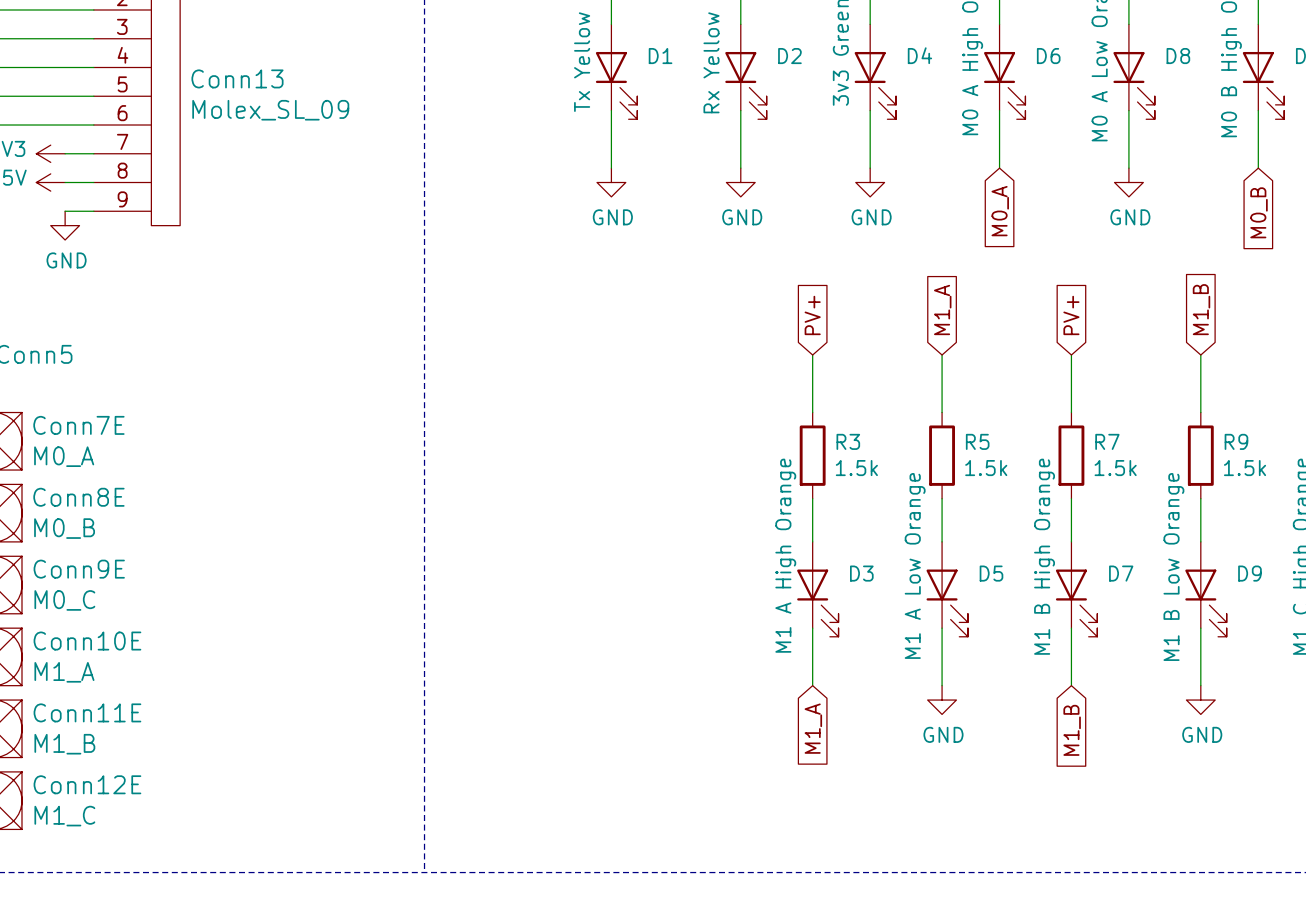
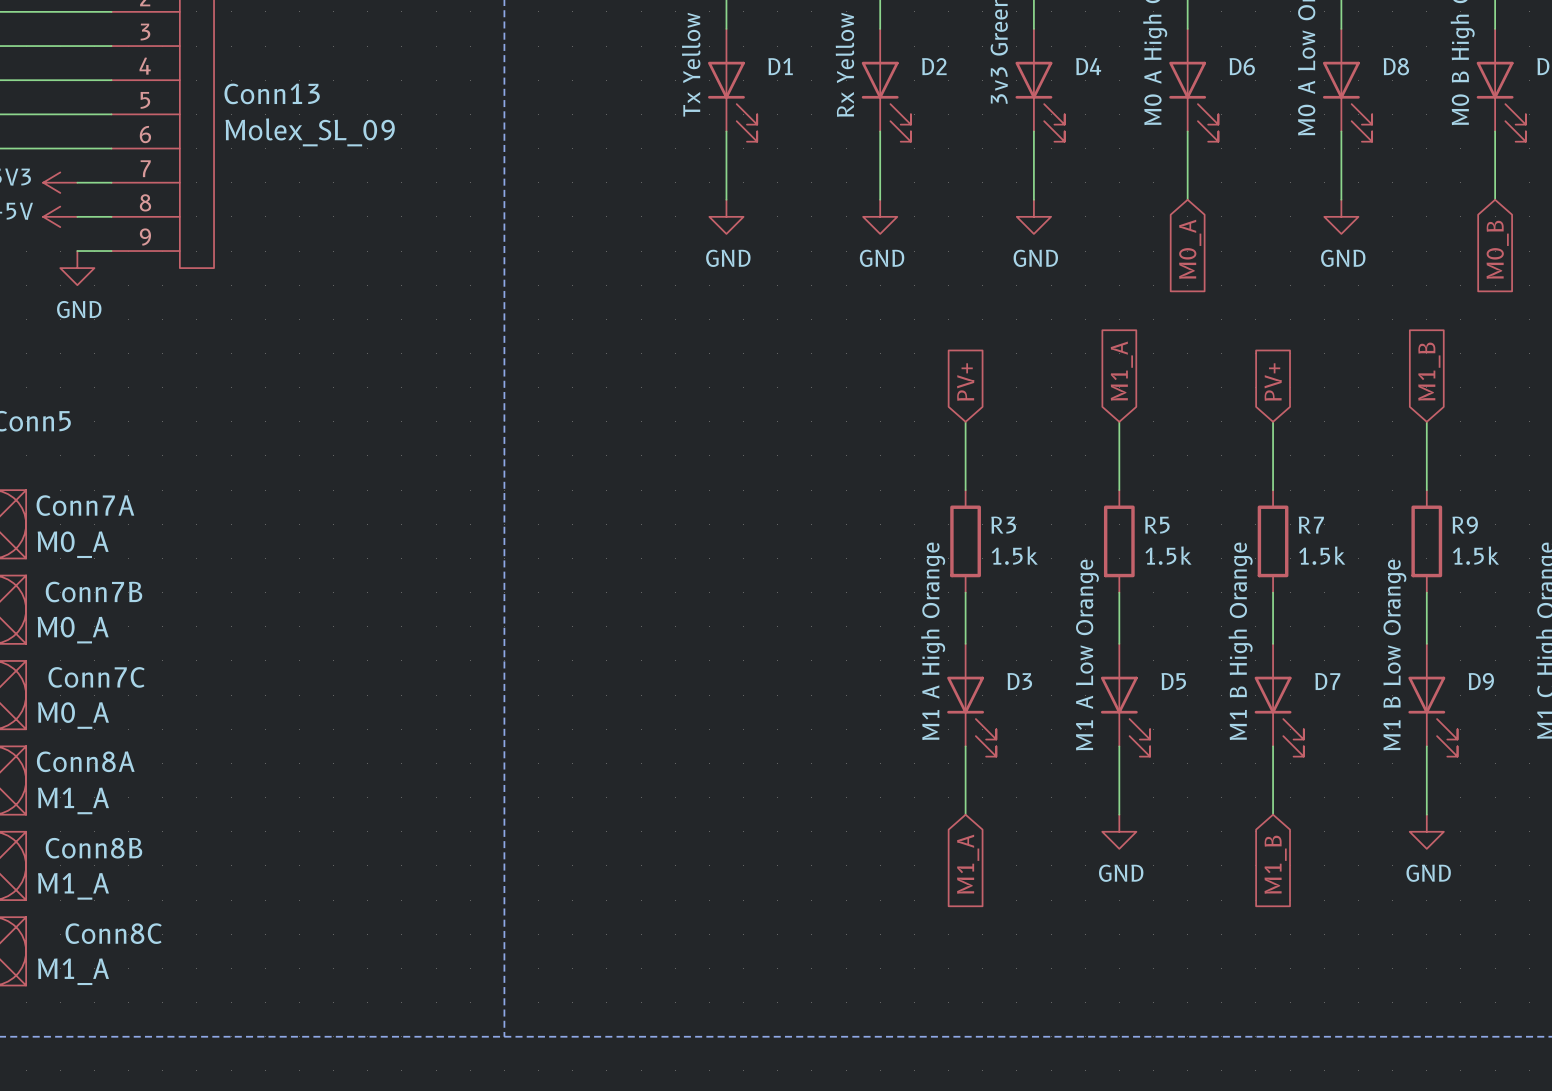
Conn7E name: Conn7E (78, 425) -> Conn7A (85, 505)
Conn8E name: Conn8E (78, 497) -> Conn7B (93, 592)
Conn8E value: M0_B (64, 528) -> M0_A (73, 630)
Conn9E name: Conn9E (79, 569) -> Conn7C (96, 677)
Conn9E value: M0_C (64, 600) -> M0_A (73, 715)
Conn10E name: Conn10E (87, 641) -> Conn8A (85, 761)
Conn11E name: Conn11E (87, 712) -> Conn8B (93, 848)
Conn11E value: M1_B (64, 744) -> M1_A (73, 886)
Conn12E name: Conn12E (87, 784) -> Conn8C (113, 933)
Conn12E value: M1_C (64, 816) -> M1_A (73, 971)

